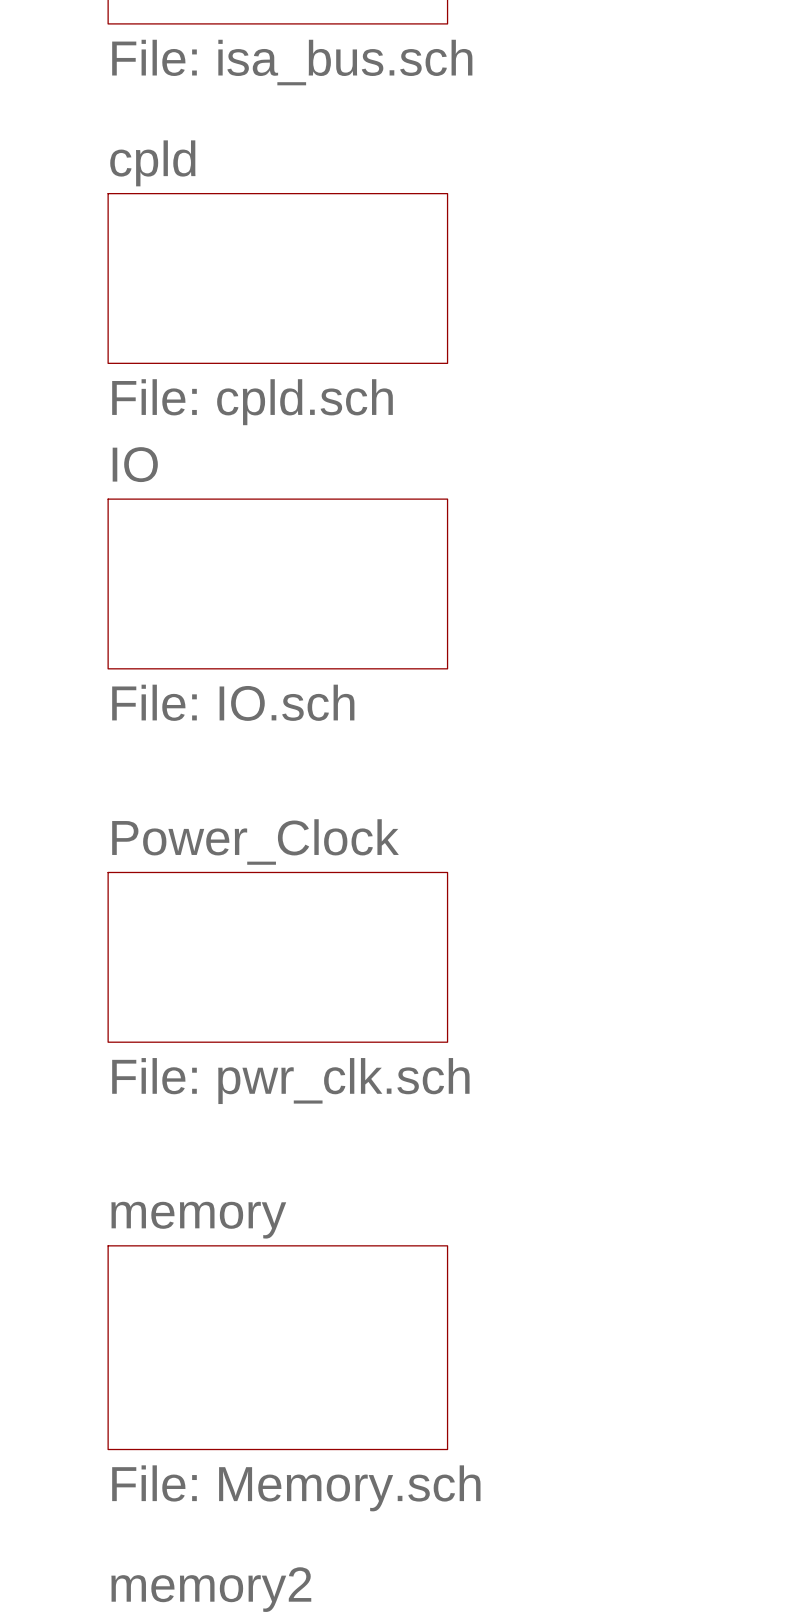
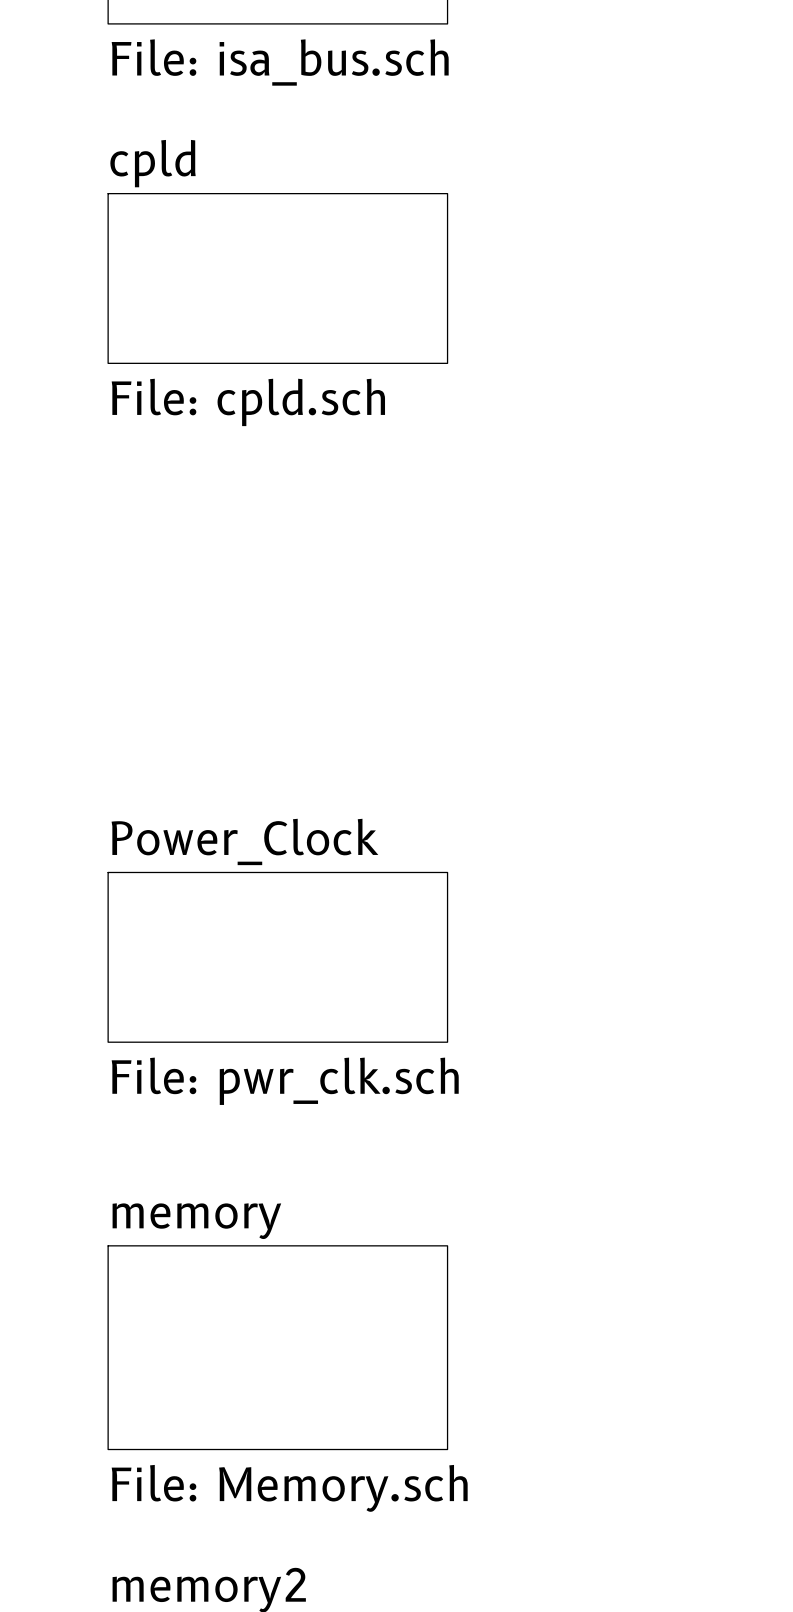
sheet IO: File: IO.sch (277, 583) -> none

